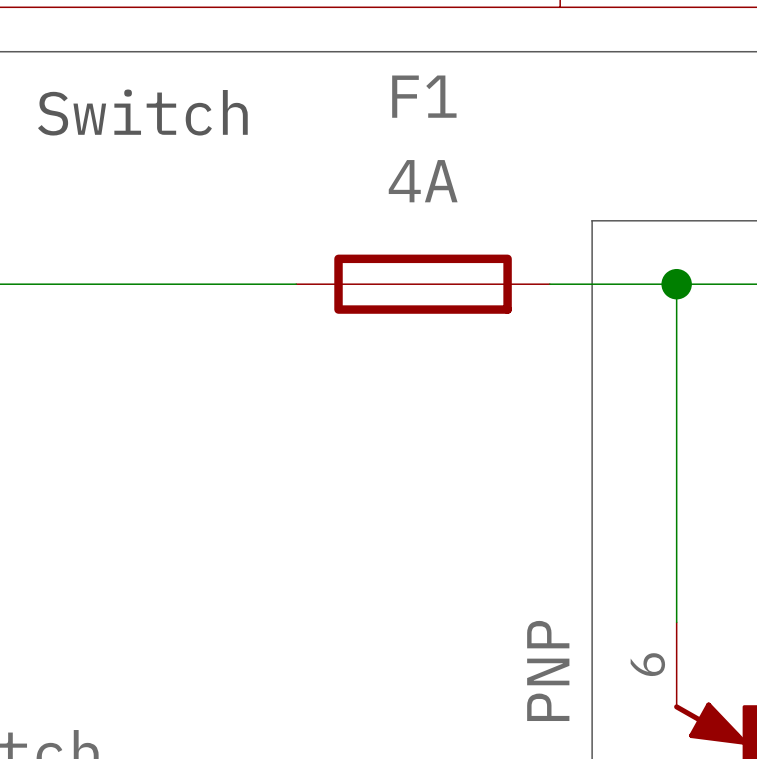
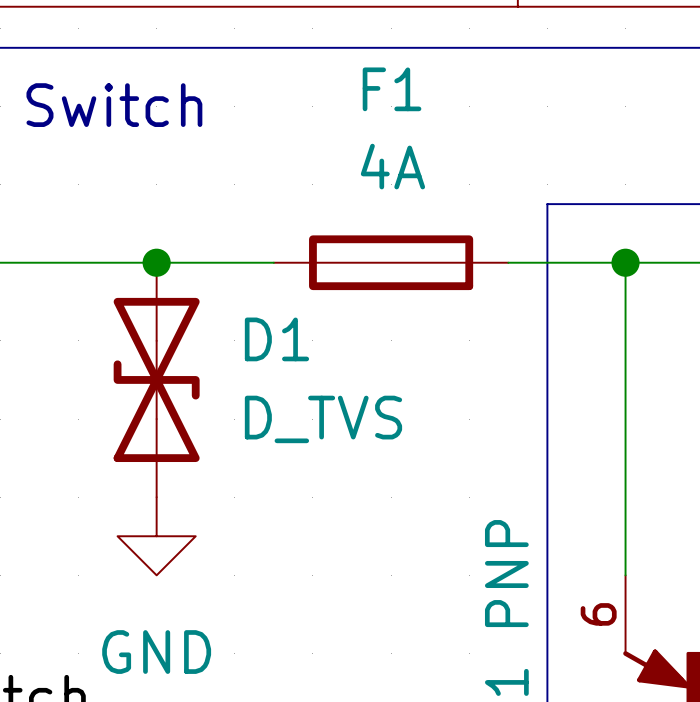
junction: none -> (156, 262)
D1: none -> D_TVS (156, 379)
power symbol: none -> GND (156, 536)

